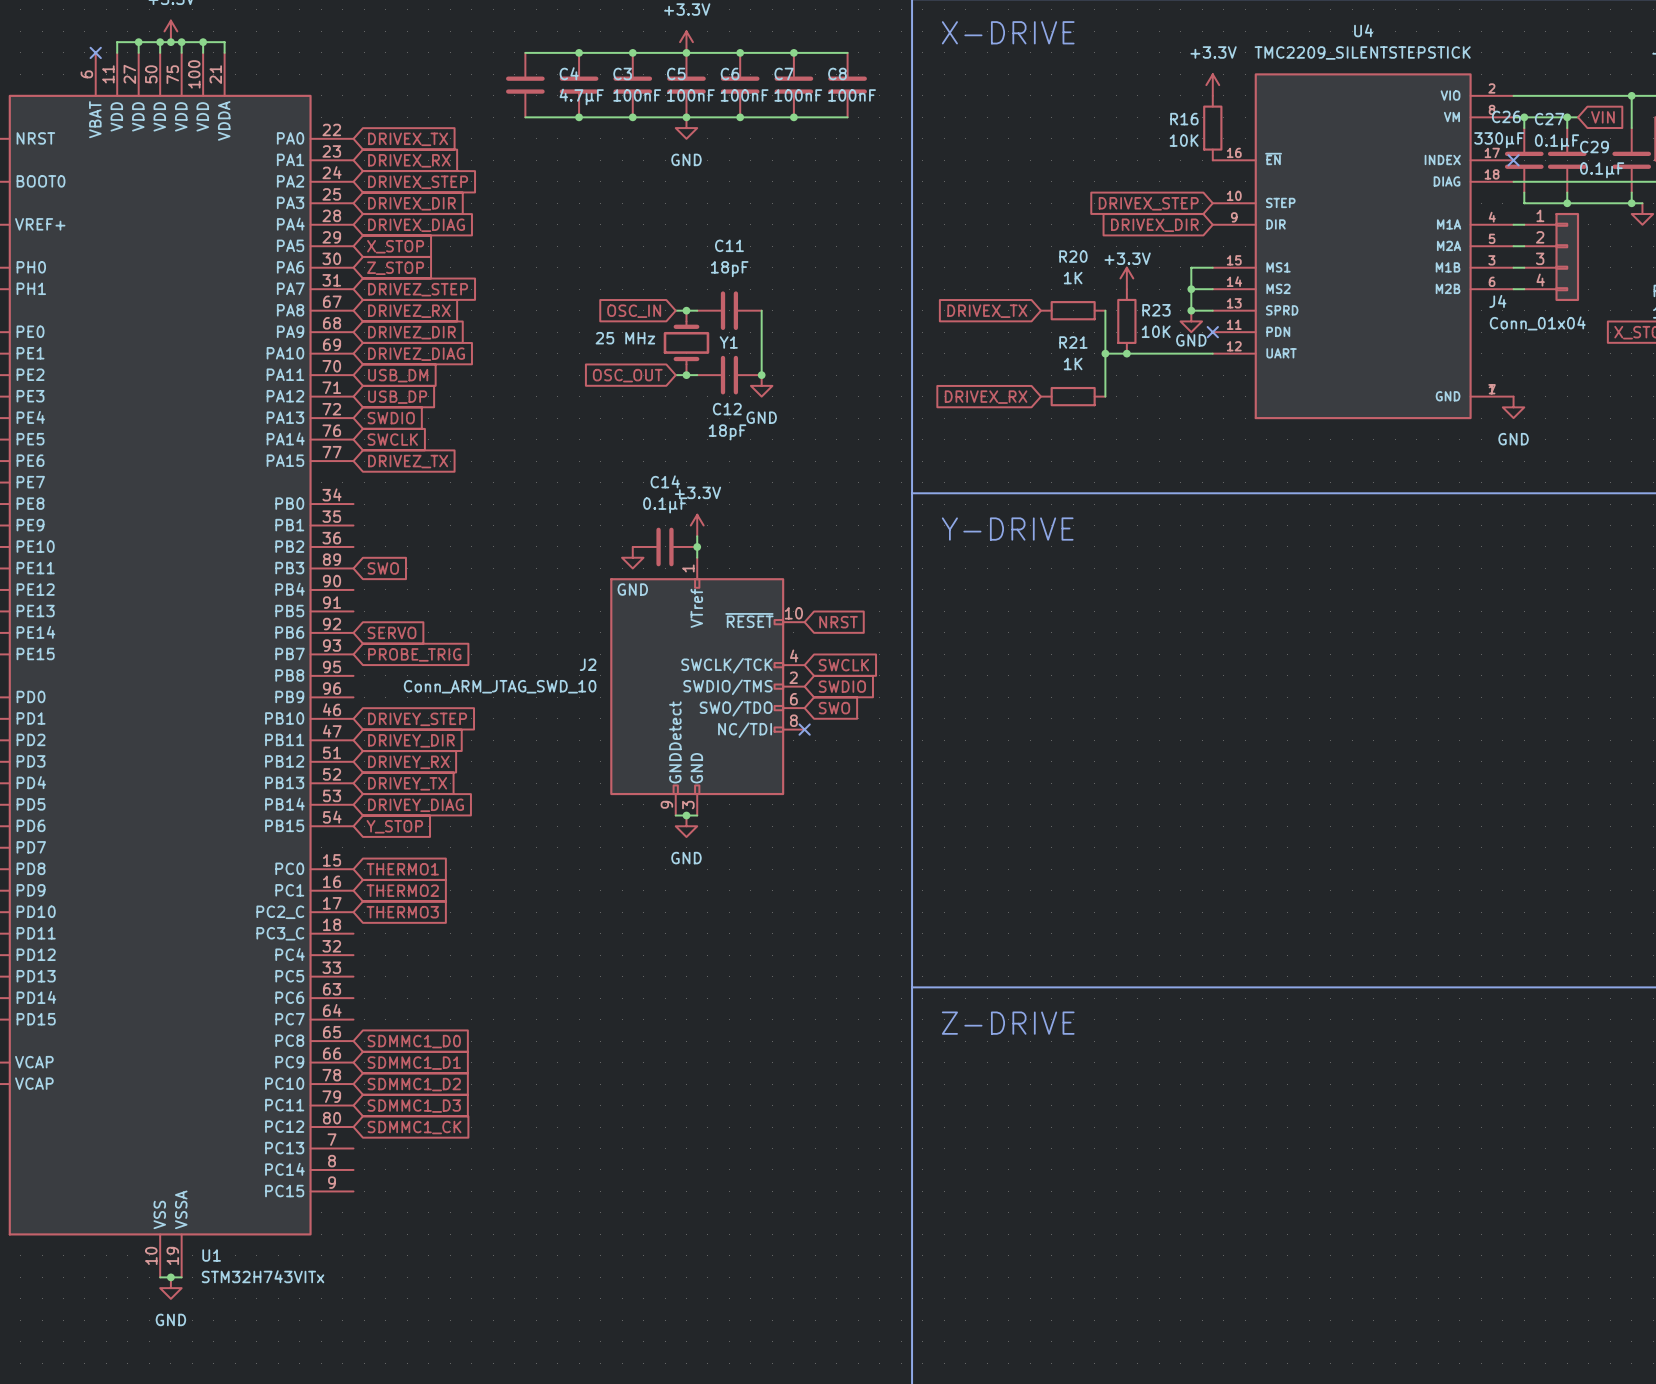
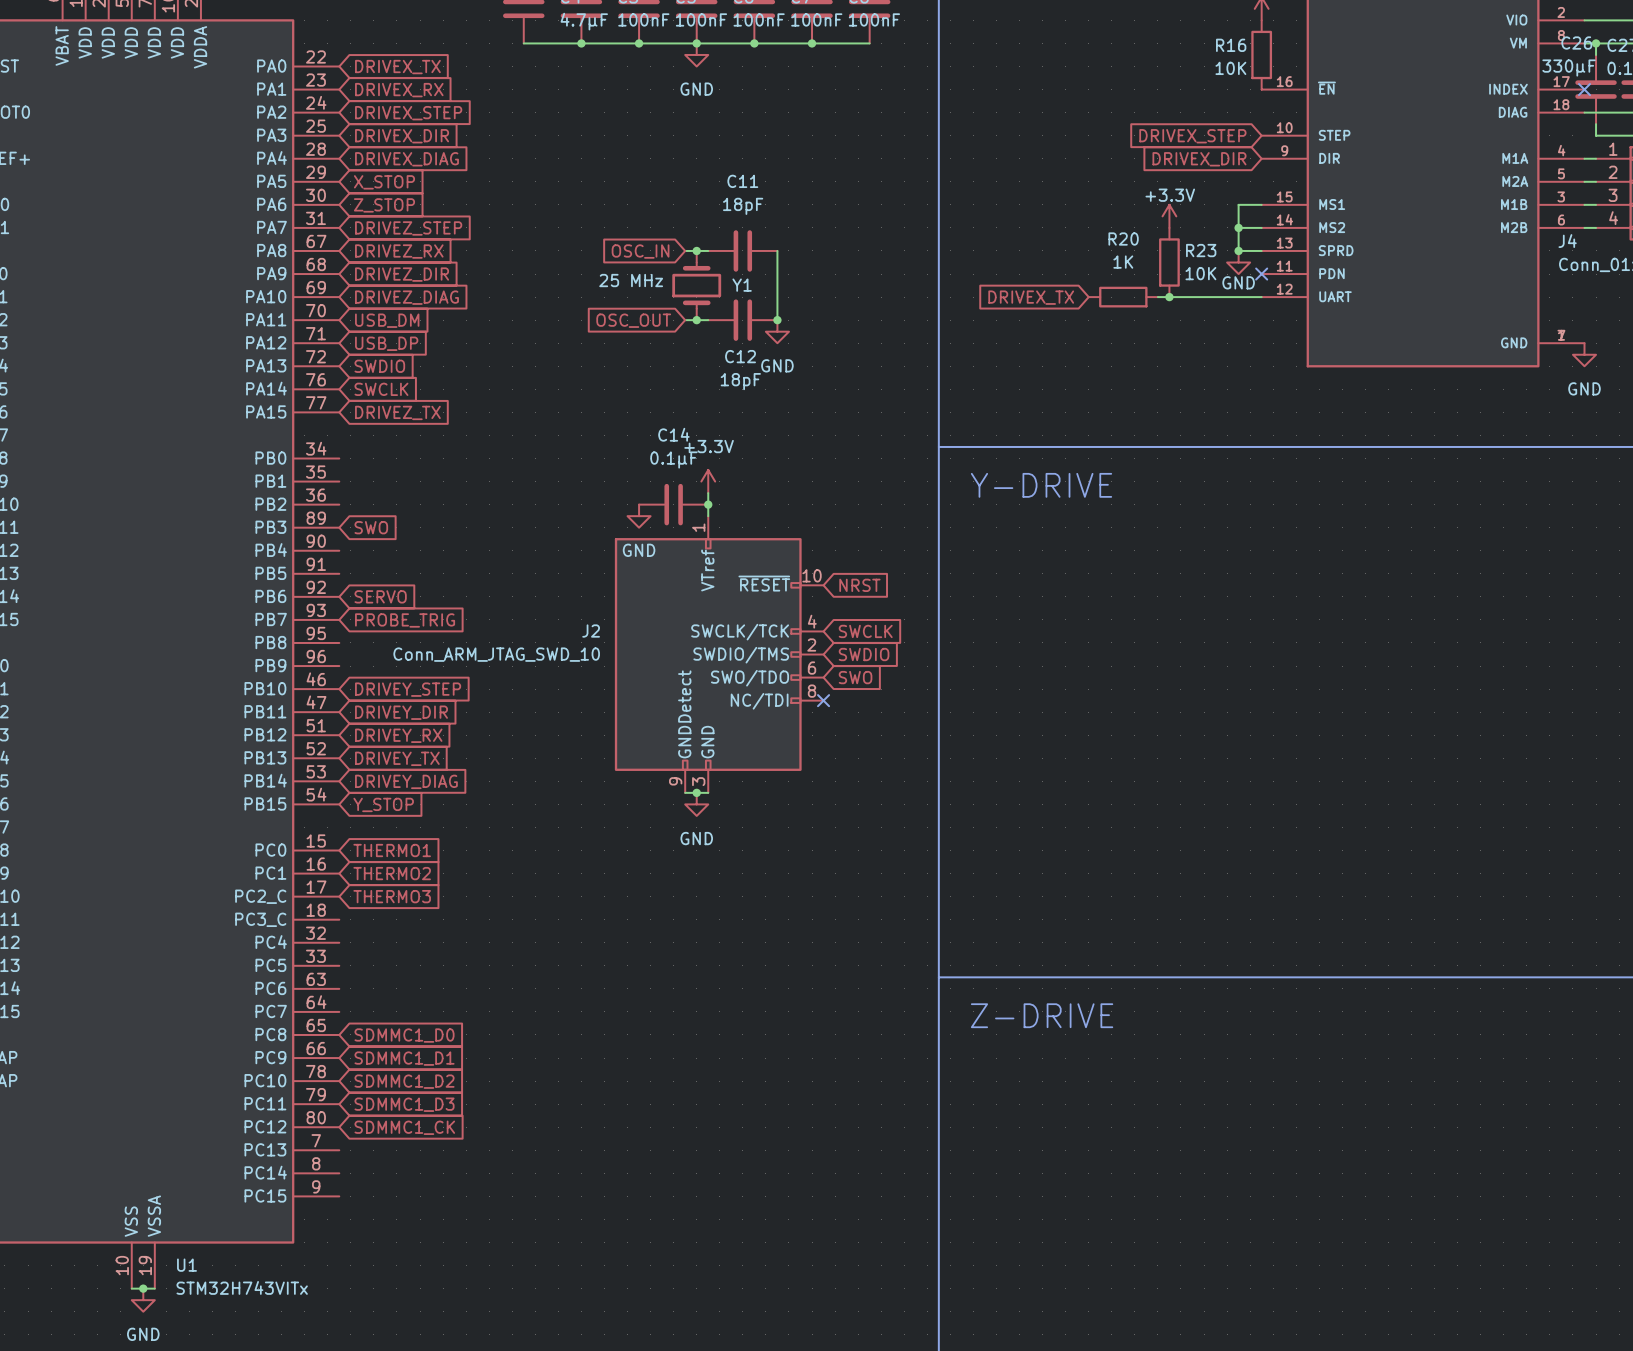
R20 position: (1073, 310) -> (1123, 297)
wire: (1105, 310) (1105, 396) -> none
global label position: DRIVEX_TX (987, 311) -> DRIVEX_TX (1031, 297)
junction: (1105, 353) -> none
R21: 1K (1073, 396) -> none
global label: DRIVEX_RX (986, 397) -> none

